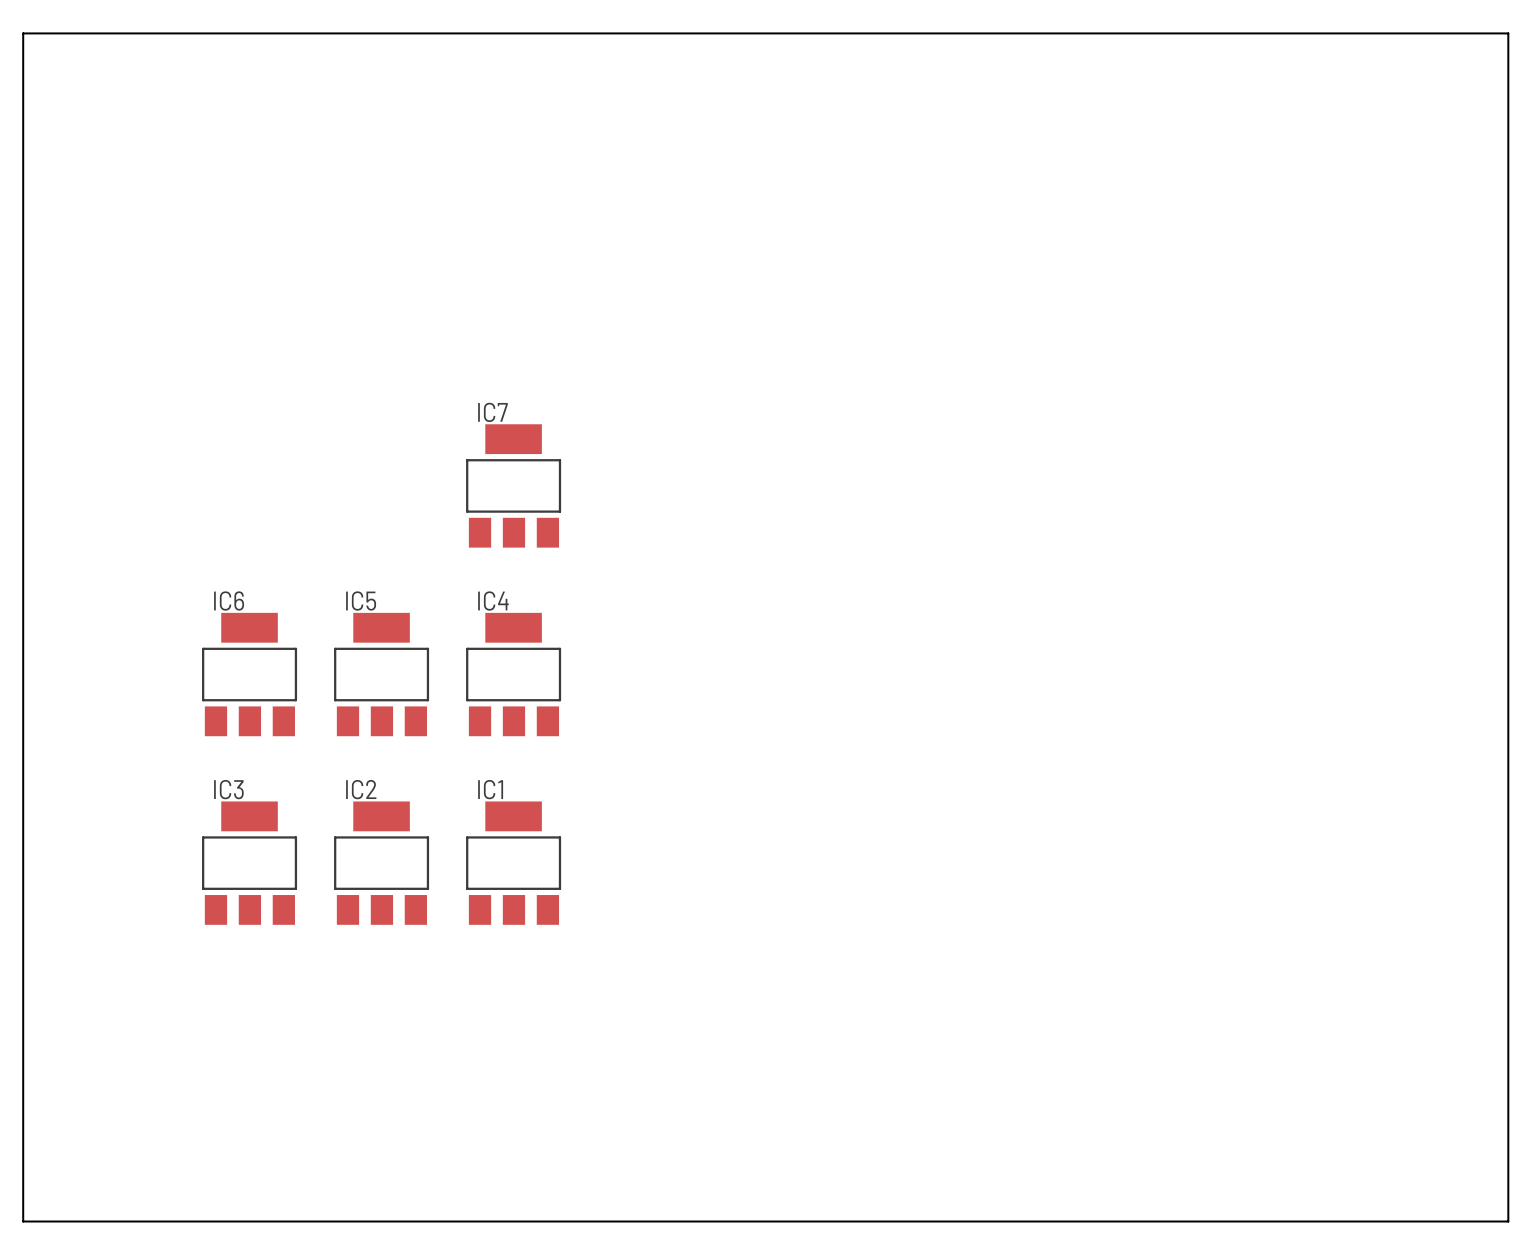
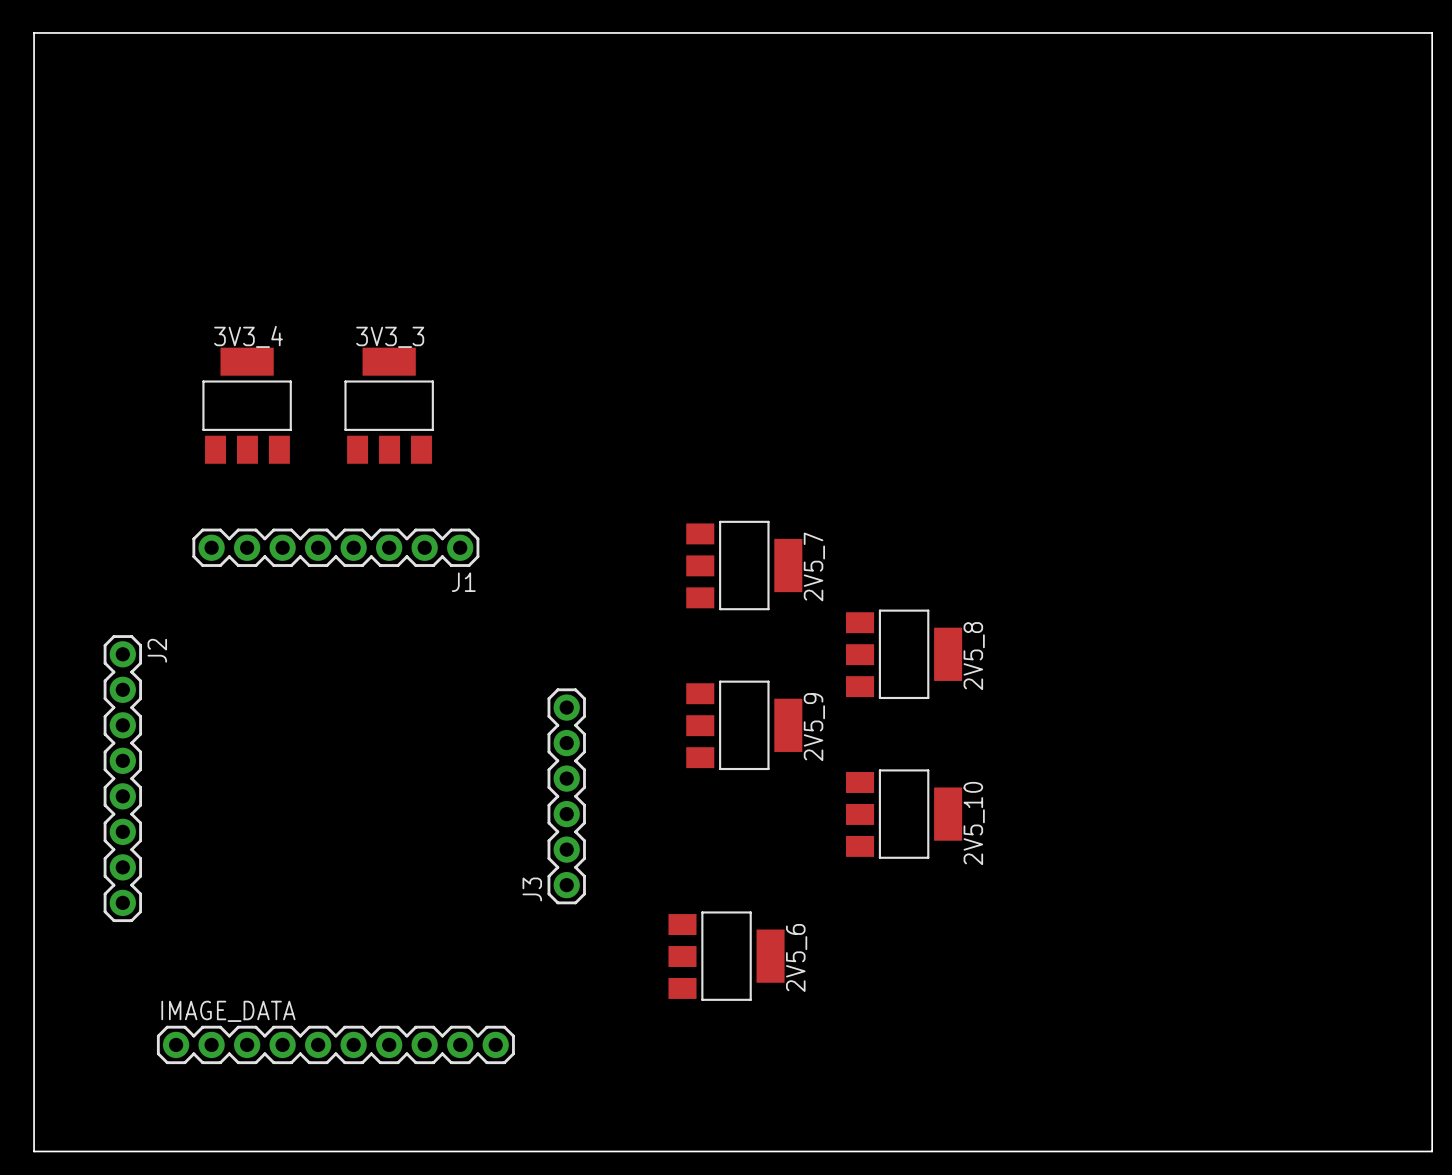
3V3_4: none -> (247, 405)
3V3_3: none -> (389, 405)
IC7: (513, 485) -> none
J1: none -> (335, 547)
2V5_7: none -> (744, 565)
IC6: (249, 674) -> none
IC5: (381, 674) -> none
IC4: (513, 674) -> none
2V5_8: none -> (904, 654)
2V5_9: none -> (744, 725)
J2: none -> (122, 778)
J3: none -> (566, 796)
IC3: (249, 863) -> none
IC2: (381, 863) -> none
IC1: (513, 863) -> none
2V5_10: none -> (904, 814)
2V5_6: none -> (726, 956)
IMAGE_DATA: none -> (335, 1044)

